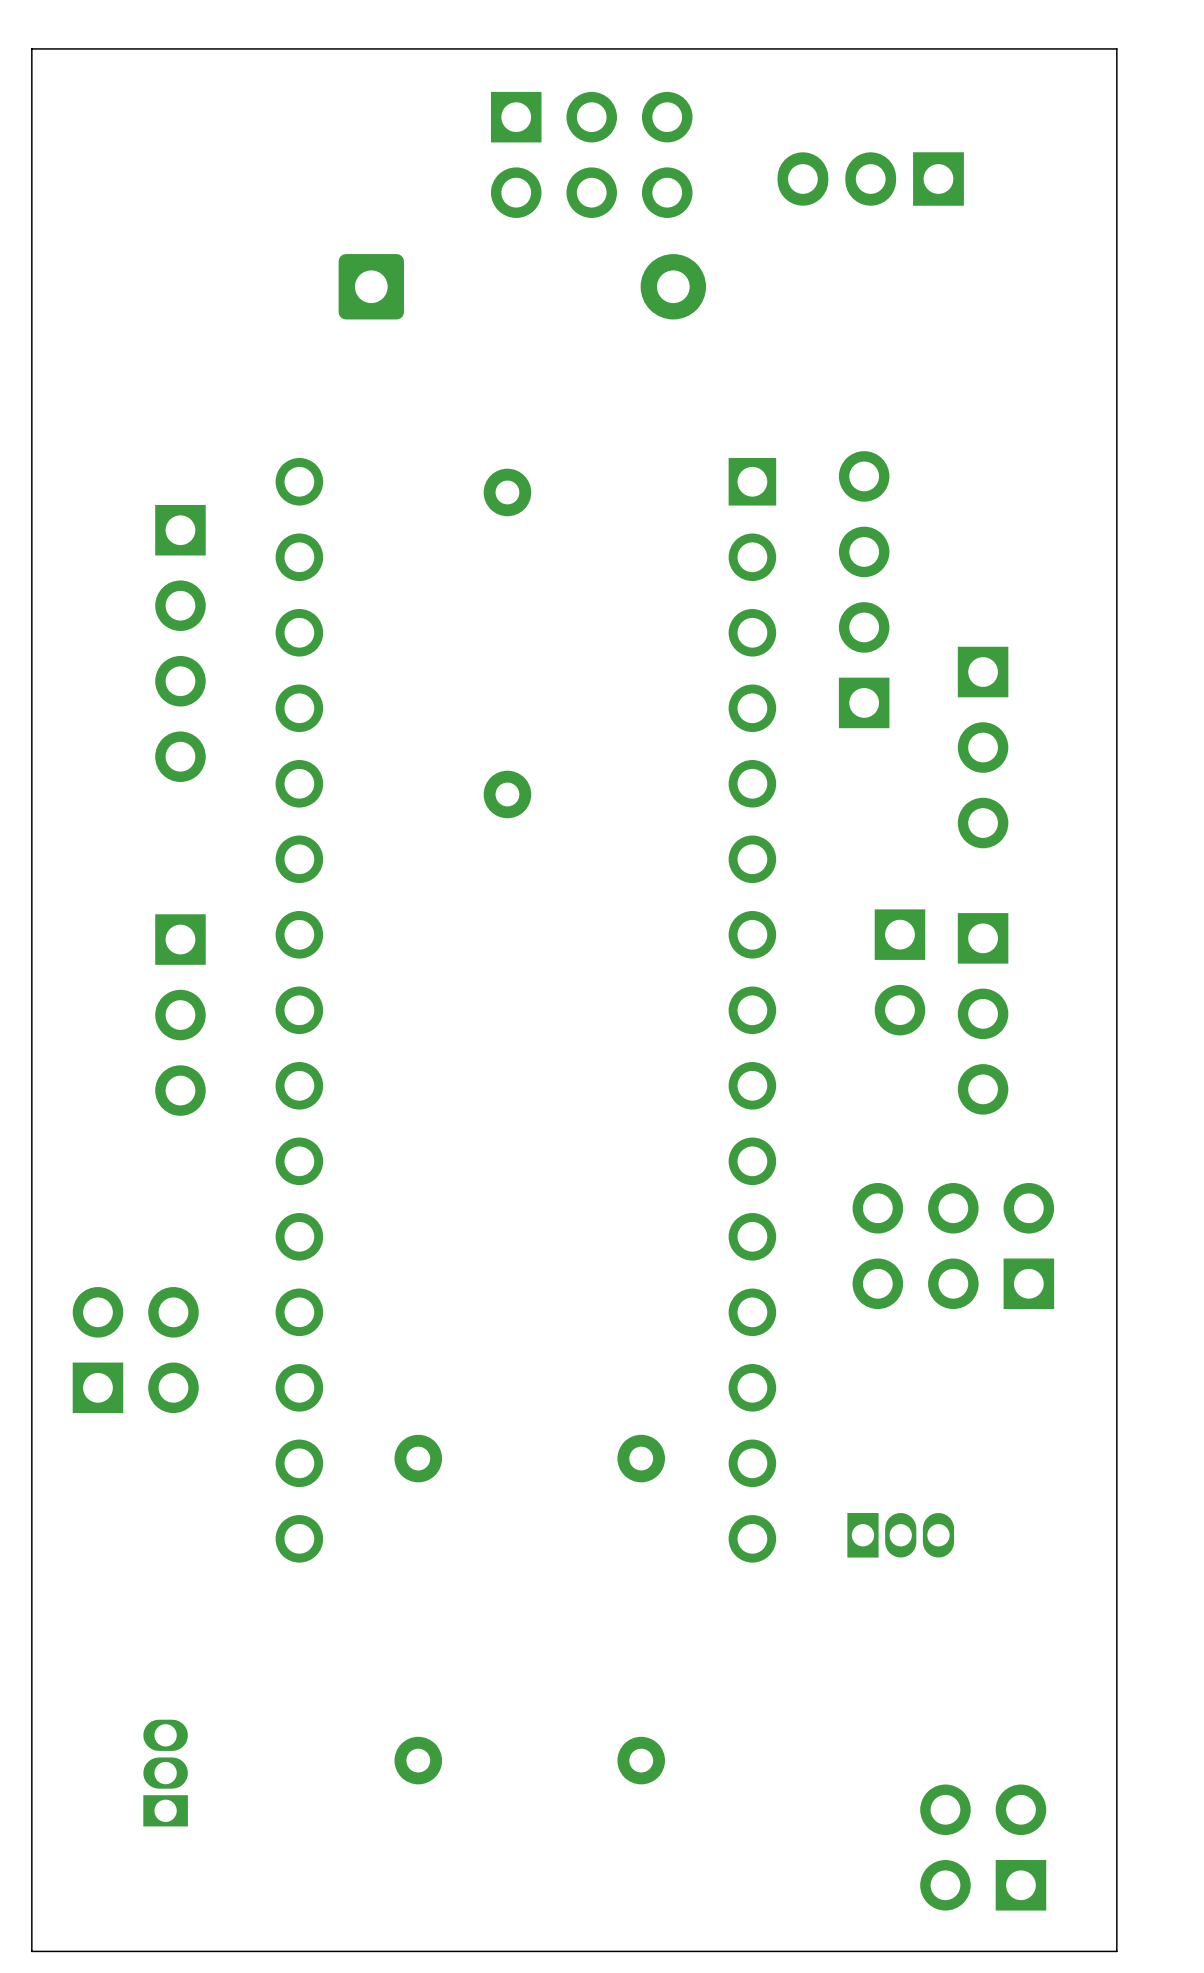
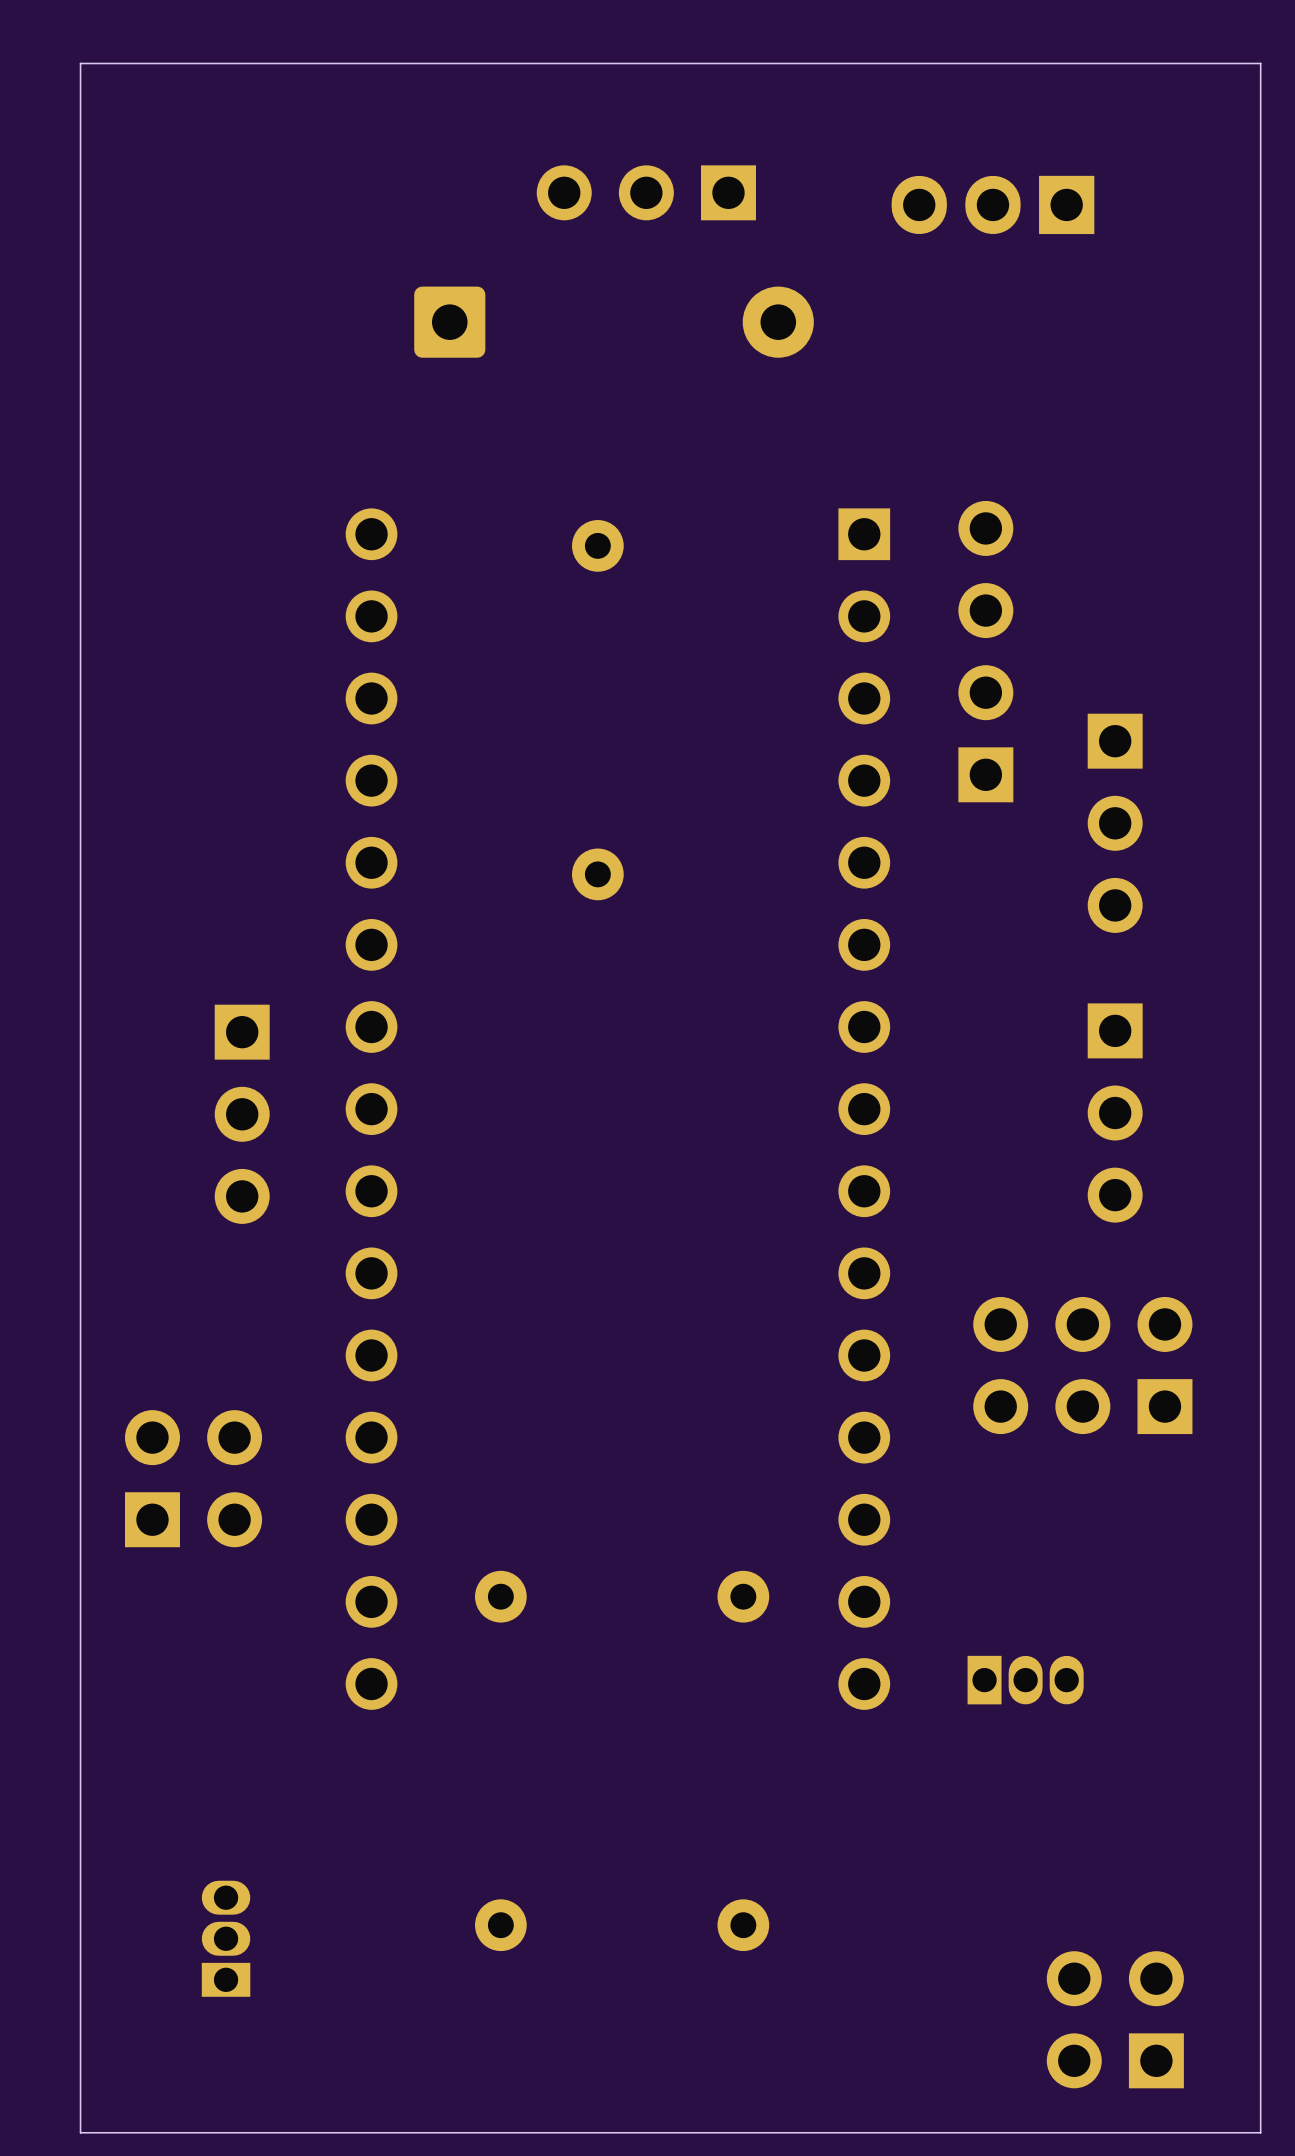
part: (591, 154) -> none
part: none -> (646, 192)
part: (180, 643) -> none
part: (899, 972) -> none

